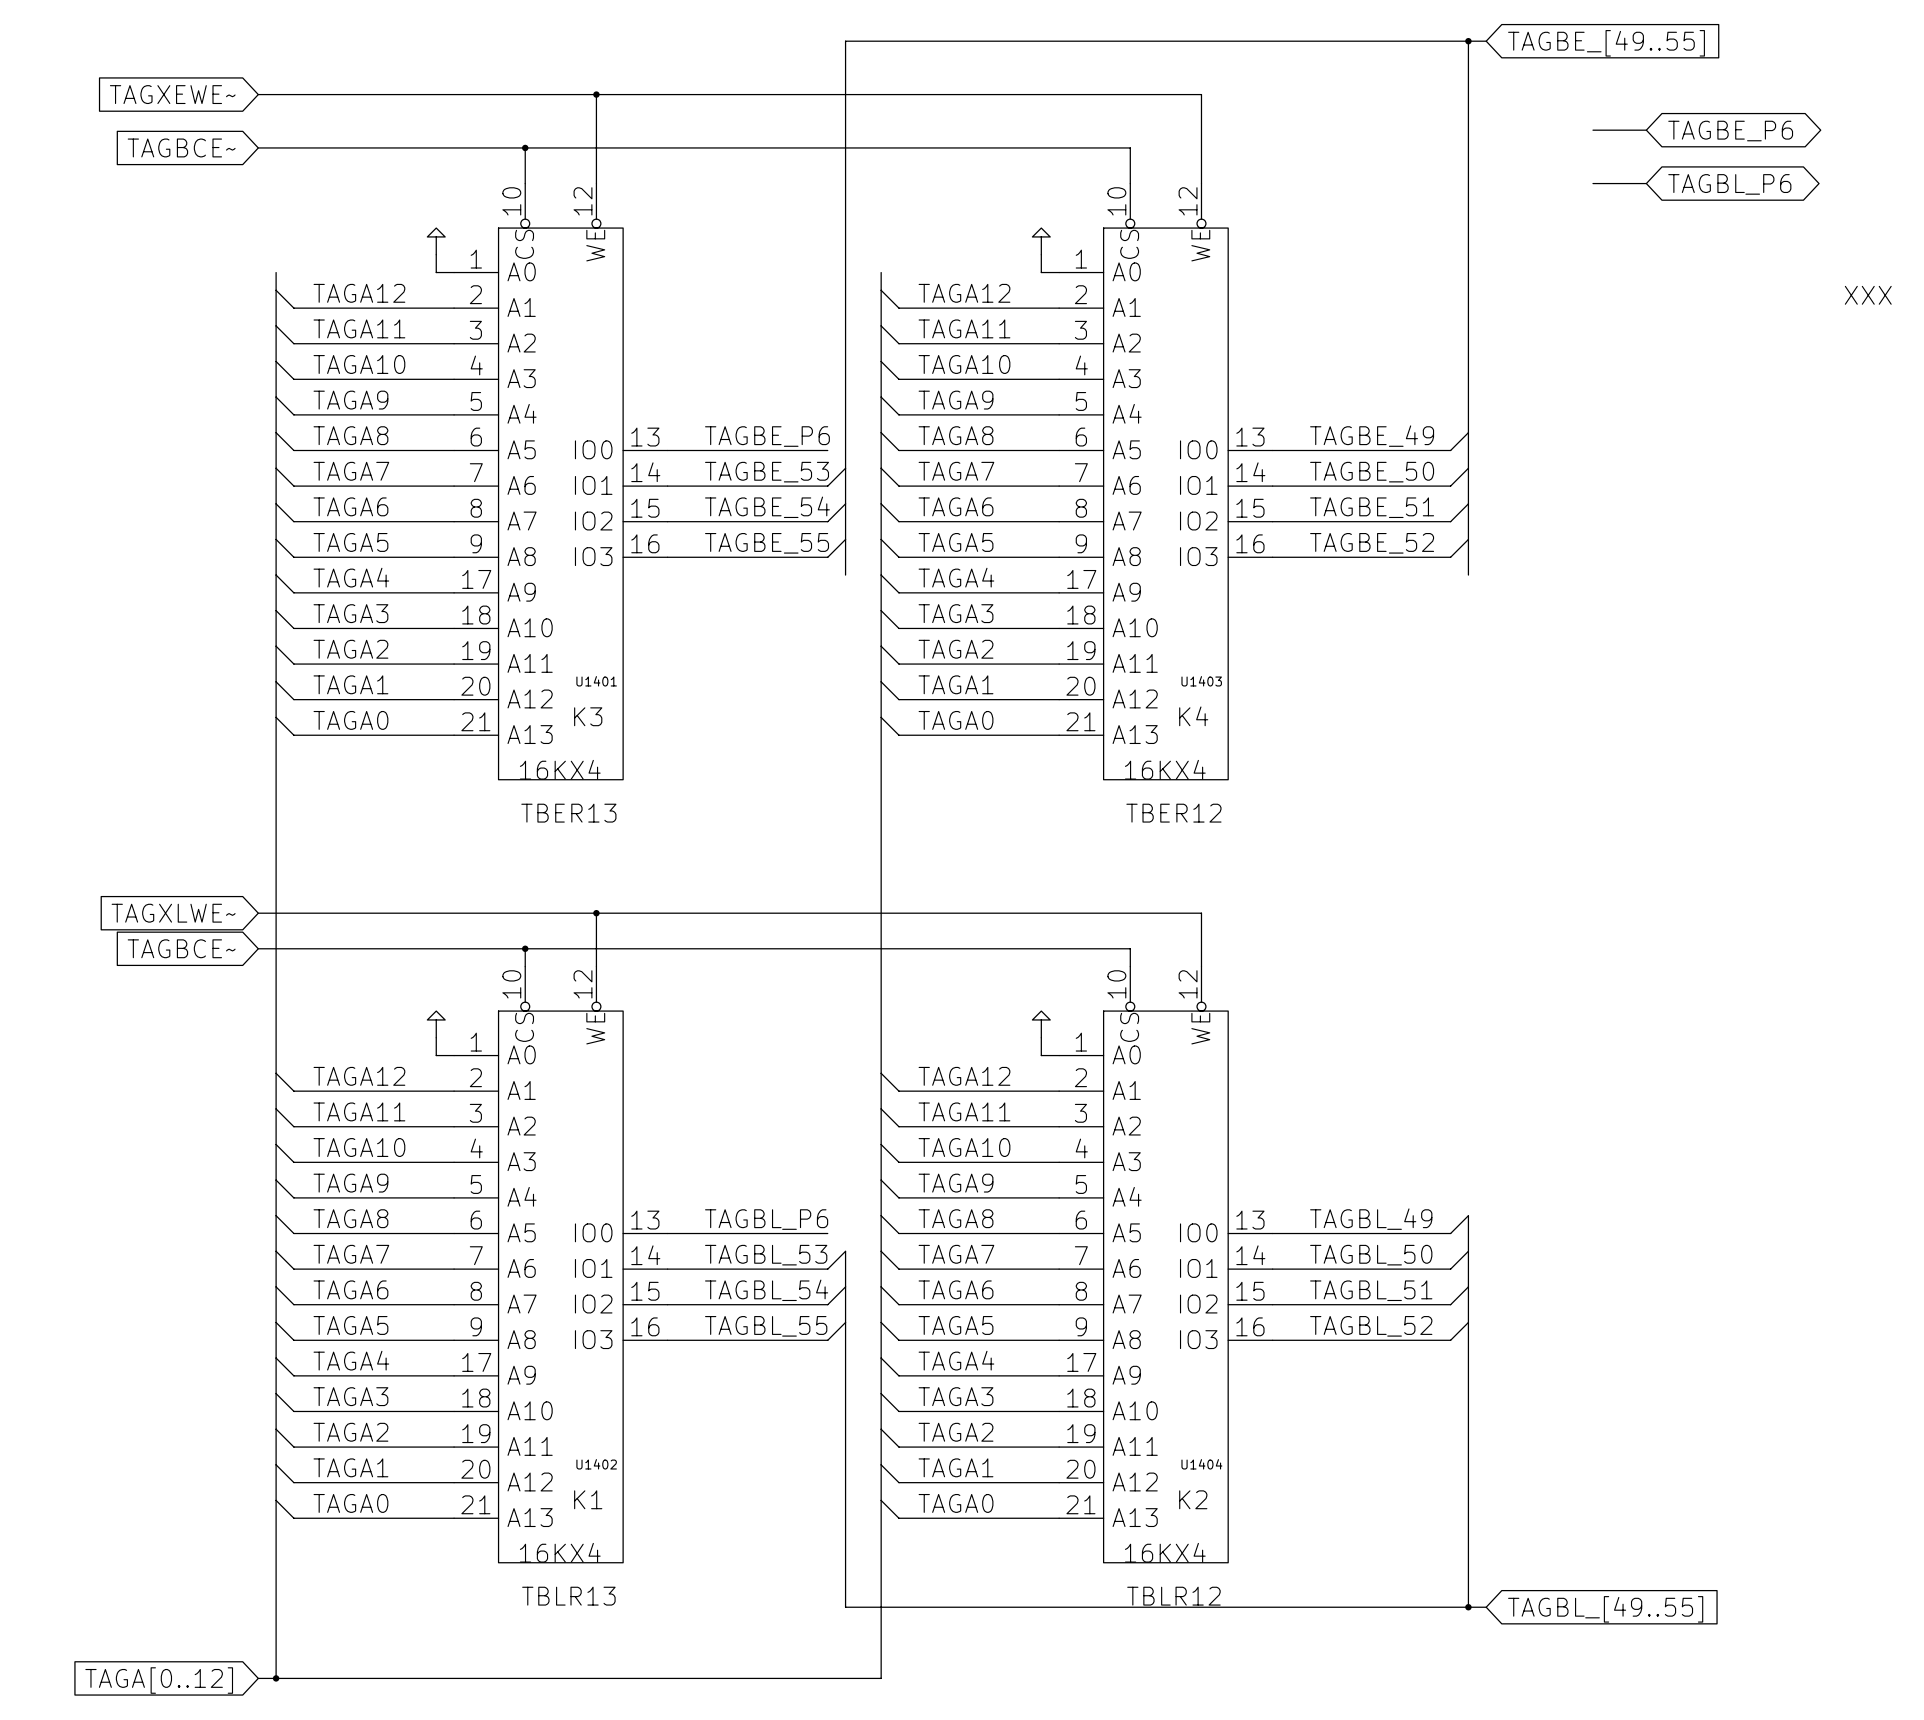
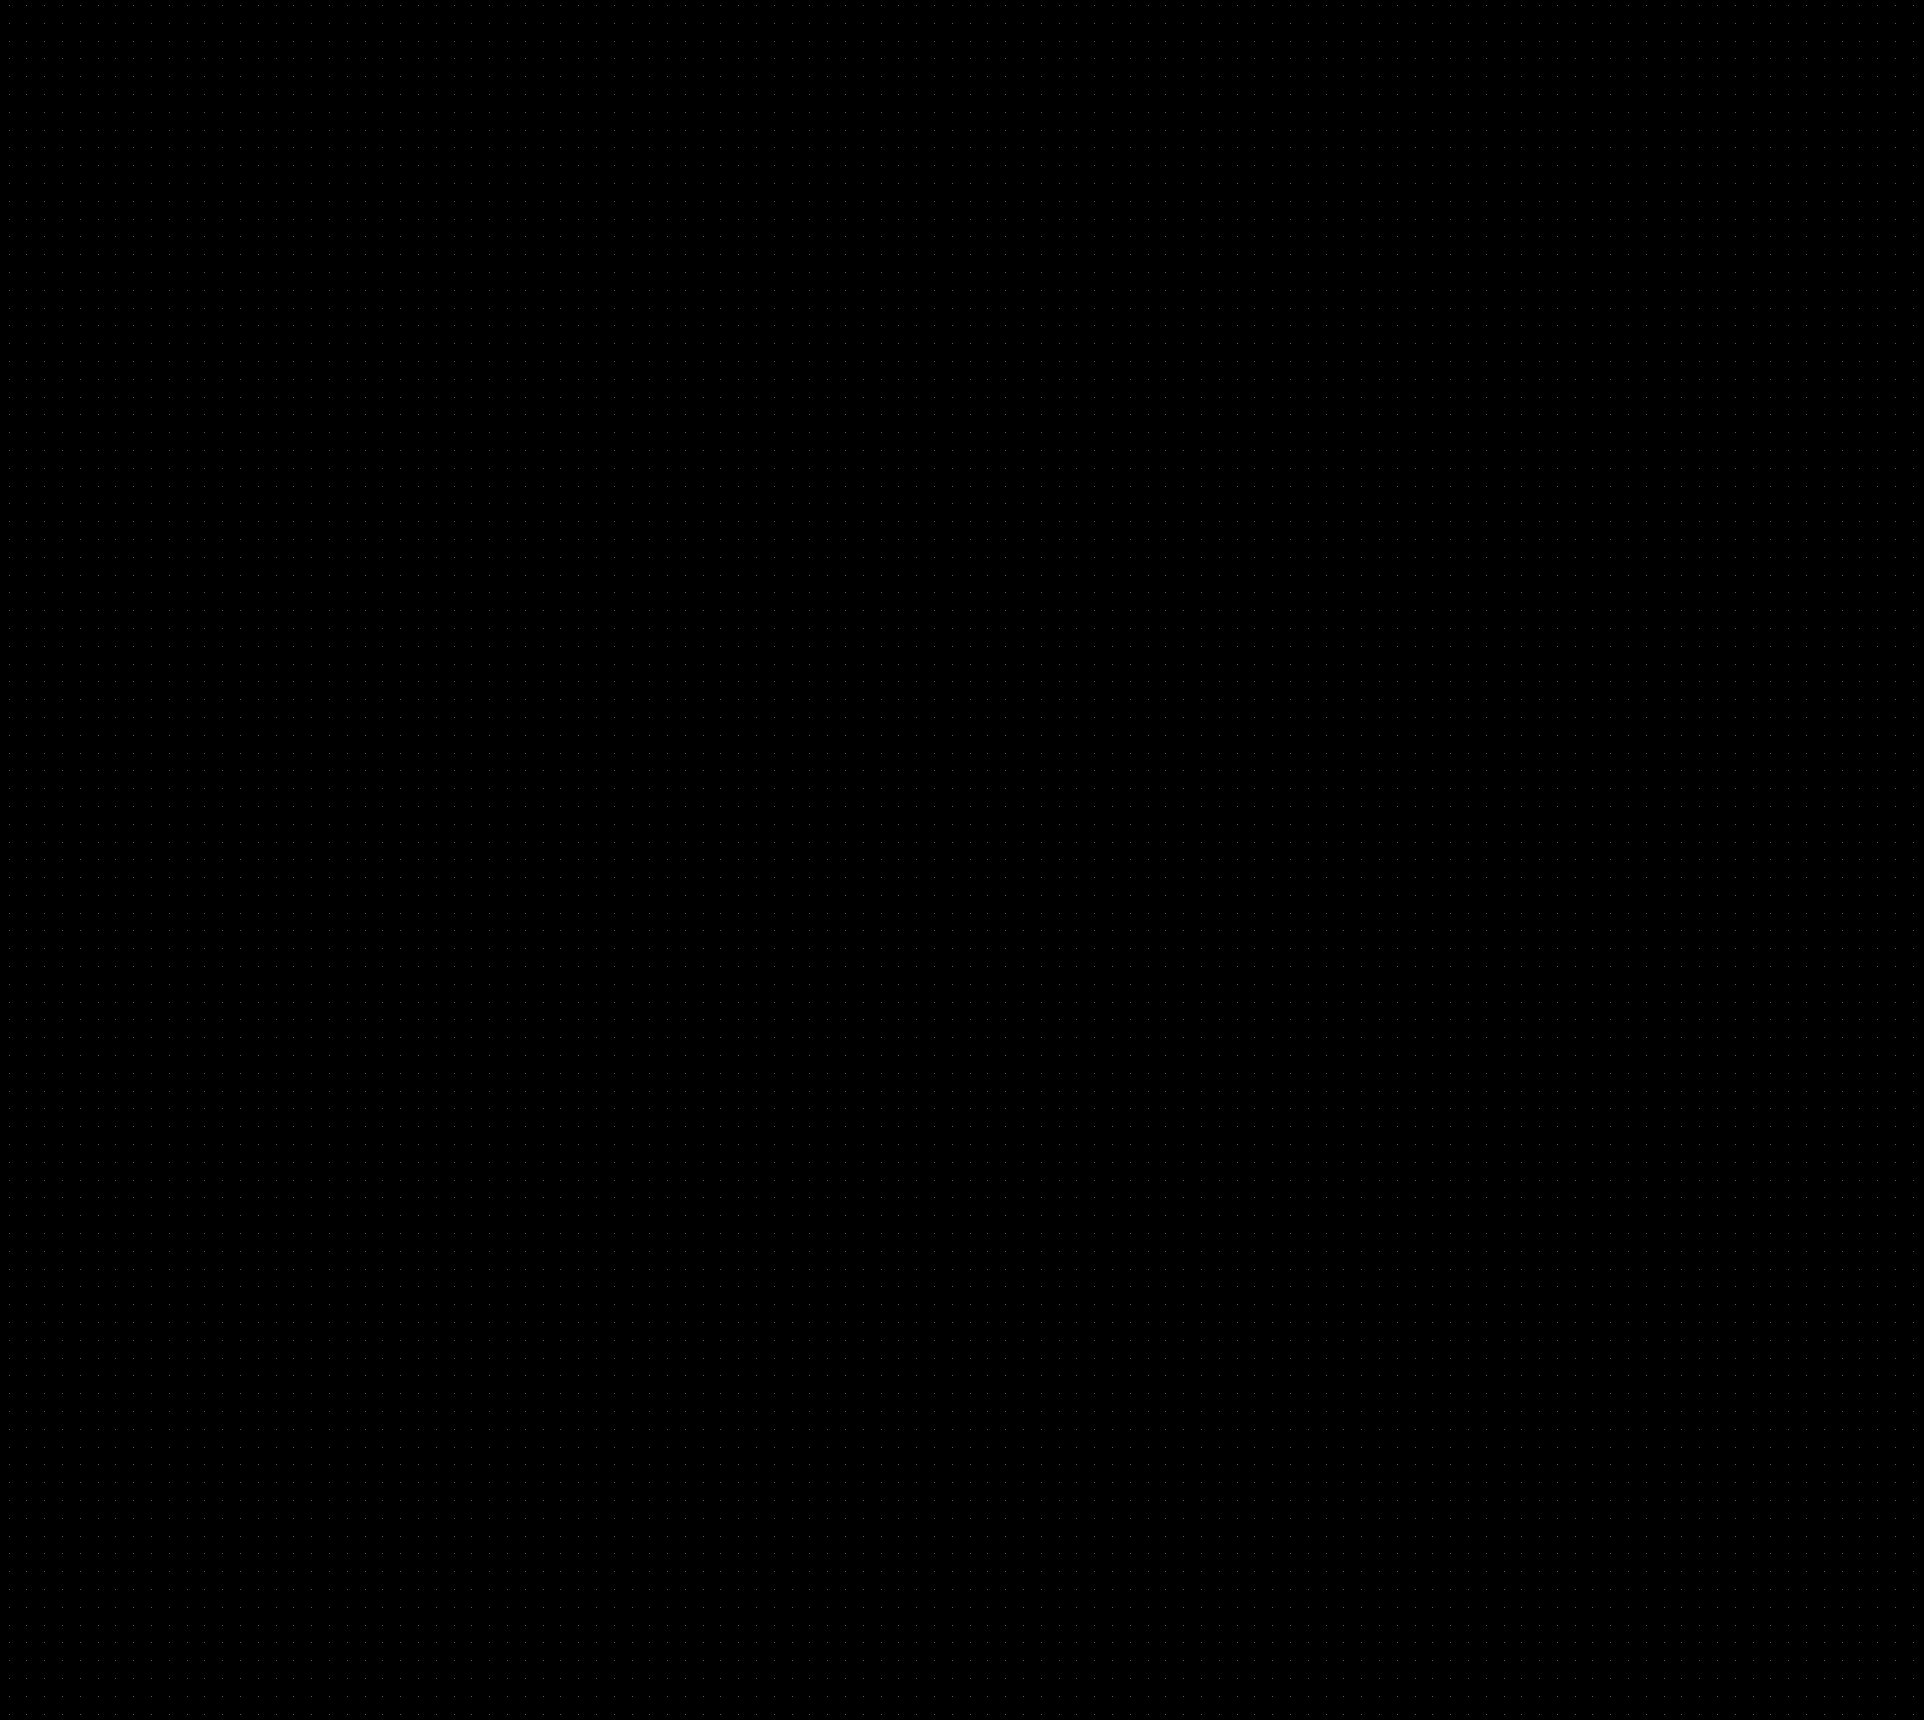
bus: (1468, 41) (1468, 575) -> none
junction: (1468, 41) -> none
bus: (1486, 41) (845, 41) (845, 575) -> none
global label: TAGBE_[49..55] (1606, 43) -> none
global label: TAGXEWE~ (172, 94) -> none
wire: (258, 94) (1201, 94) (1201, 183) -> none
wire: (596, 94) (596, 183) -> none
junction: (596, 94) -> none
wire: (1592, 130) (1646, 130) -> none
global label: TAGBE_P6 (1730, 131) -> none
global label: TAGBCE~ (181, 147) -> none
wire: (258, 147) (1130, 147) (1130, 183) -> none
wire: (525, 147) (525, 183) -> none
junction: (525, 147) -> none
wire: (1592, 183) (1646, 183) -> none
global label: TAGBL_P6 (1729, 184) -> none
power symbol: (436, 241) -> none
power symbol: (1041, 241) -> none
wire: (436, 254) (436, 272) (454, 272) -> none
wire: (1041, 254) (1041, 272) (1059, 272) -> none
bus: (276, 272) (276, 1678) -> none
bus: (881, 272) (881, 1678) (258, 1678) -> none
wire: (276, 290) (293, 308) (454, 308) -> none
wire: (881, 290) (898, 308) (1059, 308) -> none
label: TAGA12 (359, 293) -> none
label: TAGA12 (964, 293) -> none
text: XXX (1868, 295) -> none
wire: (276, 325) (293, 343) (454, 343) -> none
wire: (881, 325) (898, 343) (1059, 343) -> none
label: TAGA11 (359, 328) -> none
label: TAGA11 (964, 328) -> none
wire: (276, 361) (293, 379) (454, 379) -> none
wire: (881, 361) (898, 379) (1059, 379) -> none
label: TAGA10 (359, 364) -> none
label: TAGA10 (964, 364) -> none
wire: (276, 397) (293, 414) (454, 414) -> none
wire: (881, 397) (898, 414) (1059, 414) -> none
label: TAGA9 (350, 400) -> none
label: TAGA9 (956, 400) -> none
wire: (276, 432) (293, 450) (454, 450) -> none
wire: (881, 432) (898, 450) (1059, 450) -> none
wire: (1468, 432) (1450, 450) (1272, 450) -> none
label: TAGA8 (350, 435) -> none
label: TAGA8 (956, 435) -> none
label: TAGBE_P6 (767, 436) -> none
label: TAGBE_49 (1372, 436) -> none
wire: (667, 450) (827, 450) -> none
wire: (276, 468) (293, 486) (454, 486) -> none
wire: (845, 468) (827, 486) (667, 486) -> none
wire: (881, 468) (898, 486) (1059, 486) -> none
wire: (1468, 468) (1450, 486) (1272, 486) -> none
label: TAGA7 (351, 471) -> none
label: TAGA7 (956, 471) -> none
label: TAGBE_53 (767, 472) -> none
label: TAGBE_50 (1372, 472) -> none
U1401: 16KX4 (560, 481) -> none
U1403: 16KX4 (1165, 481) -> none
wire: (276, 503) (293, 521) (454, 521) -> none
wire: (845, 503) (827, 521) (667, 521) -> none
wire: (881, 503) (898, 521) (1059, 521) -> none
wire: (1468, 503) (1450, 521) (1272, 521) -> none
label: TAGA6 (350, 506) -> none
label: TAGA6 (956, 506) -> none
label: TAGBE_54 (767, 507) -> none
label: TAGBE_51 (1372, 507) -> none
wire: (276, 539) (293, 557) (454, 557) -> none
wire: (845, 539) (827, 557) (667, 557) -> none
wire: (881, 539) (898, 557) (1059, 557) -> none
wire: (1468, 539) (1450, 557) (1272, 557) -> none
label: TAGA5 (350, 542) -> none
label: TAGA5 (956, 542) -> none
label: TAGBE_55 (767, 543) -> none
label: TAGBE_52 (1372, 543) -> none
wire: (276, 575) (293, 592) (454, 592) -> none
wire: (881, 575) (898, 592) (1059, 592) -> none
label: TAGA4 (351, 577) -> none
label: TAGA4 (956, 577) -> none
wire: (276, 610) (293, 628) (454, 628) -> none
wire: (881, 610) (898, 628) (1059, 628) -> none
label: TAGA3 (350, 613) -> none
label: TAGA3 (956, 613) -> none
wire: (276, 646) (293, 664) (454, 664) -> none
wire: (881, 646) (898, 664) (1059, 664) -> none
label: TAGA2 (350, 649) -> none
label: TAGA2 (956, 649) -> none
wire: (276, 681) (293, 699) (454, 699) -> none
wire: (881, 681) (898, 699) (1059, 699) -> none
label: TAGA1 (350, 684) -> none
label: TAGA1 (956, 684) -> none
wire: (276, 717) (293, 735) (454, 735) -> none
wire: (881, 717) (898, 735) (1059, 735) -> none
label: TAGA0 (350, 720) -> none
label: TAGA0 (956, 720) -> none
global label: TAGXLWE~ (173, 913) -> none
wire: (258, 913) (1201, 913) (1201, 966) -> none
wire: (596, 913) (596, 966) -> none
junction: (596, 913) -> none
global label: TAGBCE~ (181, 948) -> none
wire: (258, 948) (1130, 948) (1130, 966) -> none
wire: (525, 948) (525, 966) -> none
junction: (525, 948) -> none
power symbol: (436, 1024) -> none
power symbol: (1041, 1024) -> none
wire: (436, 1037) (436, 1055) (454, 1055) -> none
wire: (1041, 1037) (1041, 1055) (1059, 1055) -> none
wire: (276, 1073) (293, 1091) (454, 1091) -> none
wire: (881, 1073) (898, 1091) (1059, 1091) -> none
label: TAGA12 (359, 1076) -> none
label: TAGA12 (964, 1076) -> none
wire: (276, 1108) (293, 1126) (454, 1126) -> none
wire: (881, 1108) (898, 1126) (1059, 1126) -> none
label: TAGA11 (359, 1111) -> none
label: TAGA11 (964, 1111) -> none
wire: (276, 1144) (293, 1162) (454, 1162) -> none
wire: (881, 1144) (898, 1162) (1059, 1162) -> none
label: TAGA10 (359, 1147) -> none
label: TAGA10 (964, 1147) -> none
wire: (276, 1180) (293, 1197) (454, 1197) -> none
wire: (881, 1180) (898, 1197) (1059, 1197) -> none
label: TAGA9 (350, 1183) -> none
label: TAGA9 (956, 1183) -> none
wire: (276, 1215) (293, 1233) (454, 1233) -> none
wire: (881, 1215) (898, 1233) (1059, 1233) -> none
bus: (1468, 1215) (1468, 1607) -> none
wire: (1468, 1215) (1450, 1233) (1272, 1233) -> none
label: TAGA8 (350, 1218) -> none
label: TAGA8 (956, 1218) -> none
label: TAGBL_P6 (766, 1219) -> none
label: TAGBL_49 (1371, 1219) -> none
wire: (667, 1233) (827, 1233) -> none
wire: (276, 1251) (293, 1269) (454, 1269) -> none
bus: (845, 1251) (845, 1607) (1486, 1607) -> none
wire: (845, 1251) (827, 1269) (667, 1269) -> none
wire: (881, 1251) (898, 1269) (1059, 1269) -> none
wire: (1468, 1251) (1450, 1269) (1272, 1269) -> none
label: TAGA7 (351, 1254) -> none
label: TAGA7 (956, 1254) -> none
label: TAGBL_53 (766, 1255) -> none
label: TAGBL_50 (1371, 1255) -> none
U1402: 16KX4 (560, 1264) -> none
U1404: 16KX4 (1165, 1264) -> none
wire: (276, 1286) (293, 1304) (454, 1304) -> none
wire: (845, 1286) (827, 1304) (667, 1304) -> none
wire: (881, 1286) (898, 1304) (1059, 1304) -> none
wire: (1468, 1286) (1450, 1304) (1272, 1304) -> none
label: TAGA6 (350, 1289) -> none
label: TAGA6 (956, 1289) -> none
label: TAGBL_54 (766, 1290) -> none
label: TAGBL_51 (1371, 1290) -> none
wire: (276, 1322) (293, 1340) (454, 1340) -> none
wire: (845, 1322) (827, 1340) (667, 1340) -> none
wire: (881, 1322) (898, 1340) (1059, 1340) -> none
wire: (1468, 1322) (1450, 1340) (1272, 1340) -> none
label: TAGA5 (350, 1325) -> none
label: TAGA5 (956, 1325) -> none
label: TAGBL_55 (766, 1326) -> none
label: TAGBL_52 (1371, 1326) -> none
wire: (276, 1358) (293, 1375) (454, 1375) -> none
wire: (881, 1358) (898, 1375) (1059, 1375) -> none
label: TAGA4 (351, 1360) -> none
label: TAGA4 (956, 1360) -> none
wire: (276, 1393) (293, 1411) (454, 1411) -> none
wire: (881, 1393) (898, 1411) (1059, 1411) -> none
label: TAGA3 (350, 1396) -> none
label: TAGA3 (956, 1396) -> none
wire: (276, 1429) (293, 1447) (454, 1447) -> none
wire: (881, 1429) (898, 1447) (1059, 1447) -> none
label: TAGA2 (350, 1432) -> none
label: TAGA2 (956, 1432) -> none
wire: (276, 1464) (293, 1482) (454, 1482) -> none
wire: (881, 1464) (898, 1482) (1059, 1482) -> none
label: TAGA1 (350, 1467) -> none
label: TAGA1 (956, 1467) -> none
wire: (276, 1500) (293, 1518) (454, 1518) -> none
wire: (881, 1500) (898, 1518) (1059, 1518) -> none
label: TAGA0 (350, 1503) -> none
label: TAGA0 (956, 1503) -> none
junction: (1468, 1607) -> none
global label: TAGBL_[49..55] (1605, 1609) -> none
junction: (276, 1678) -> none
global label: TAGA[0..12] (159, 1680) -> none

